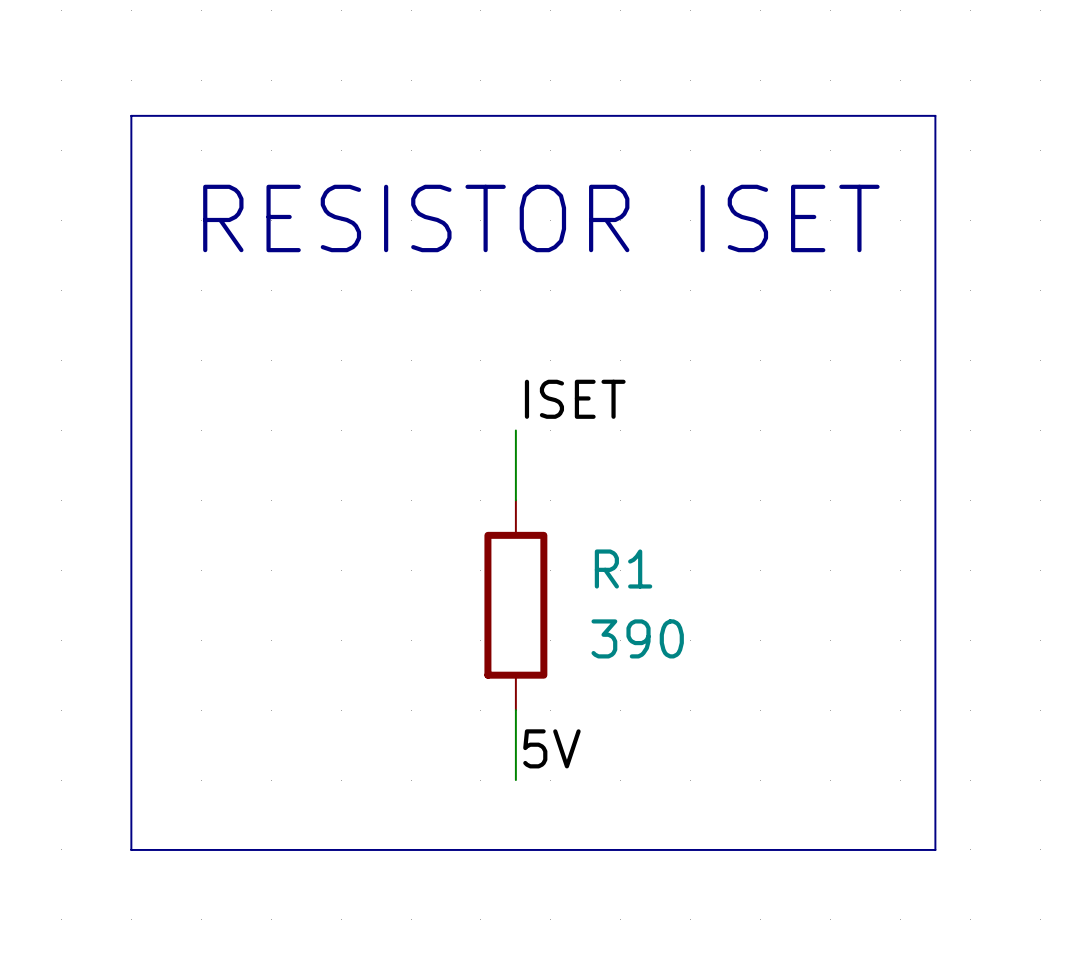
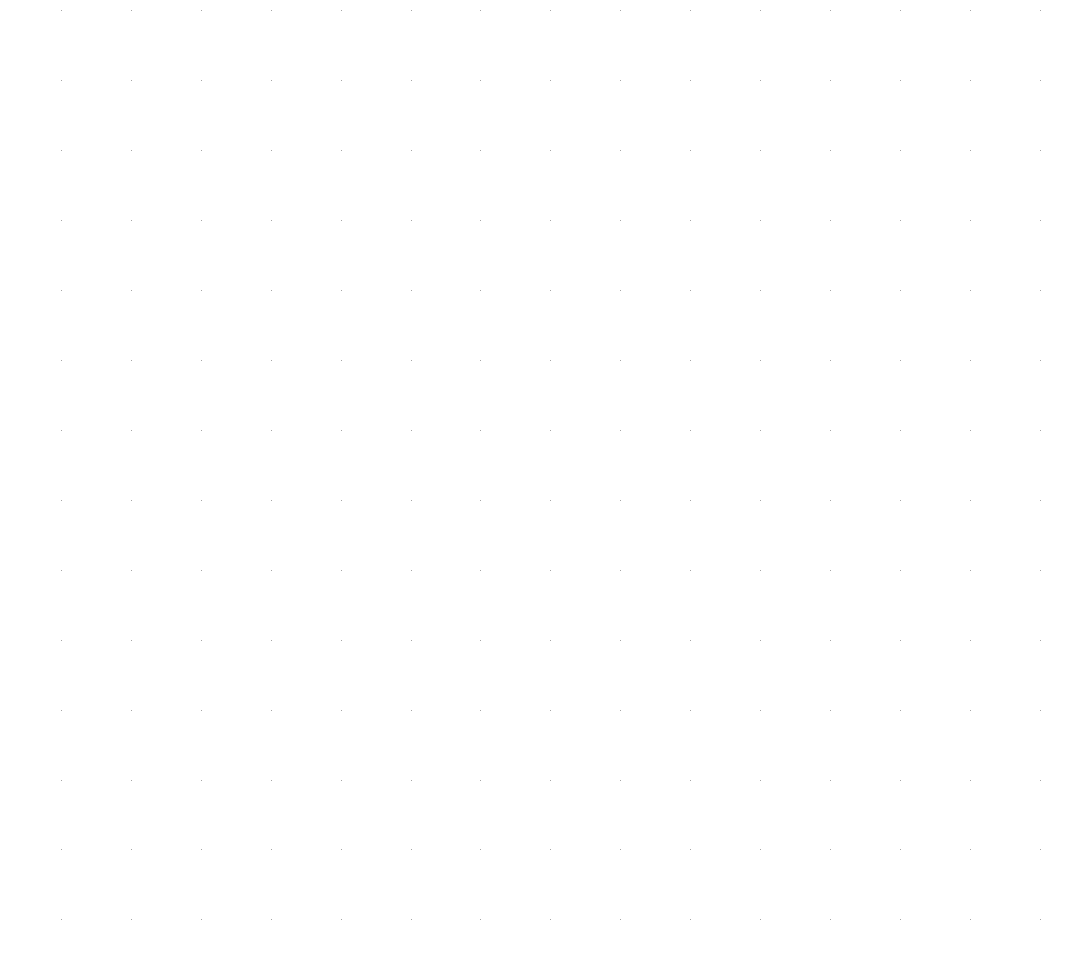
bus: (131, 115) (935, 115) (935, 849) (131, 849) (131, 115) -> none
text: RESISTOR ISET (541, 218) -> none
label: ISET (575, 399) -> none
wire: (515, 430) (515, 500) -> none
R1: 390 (515, 605) -> none
wire: (515, 710) (515, 780) -> none
label: 5V (551, 748) -> none

